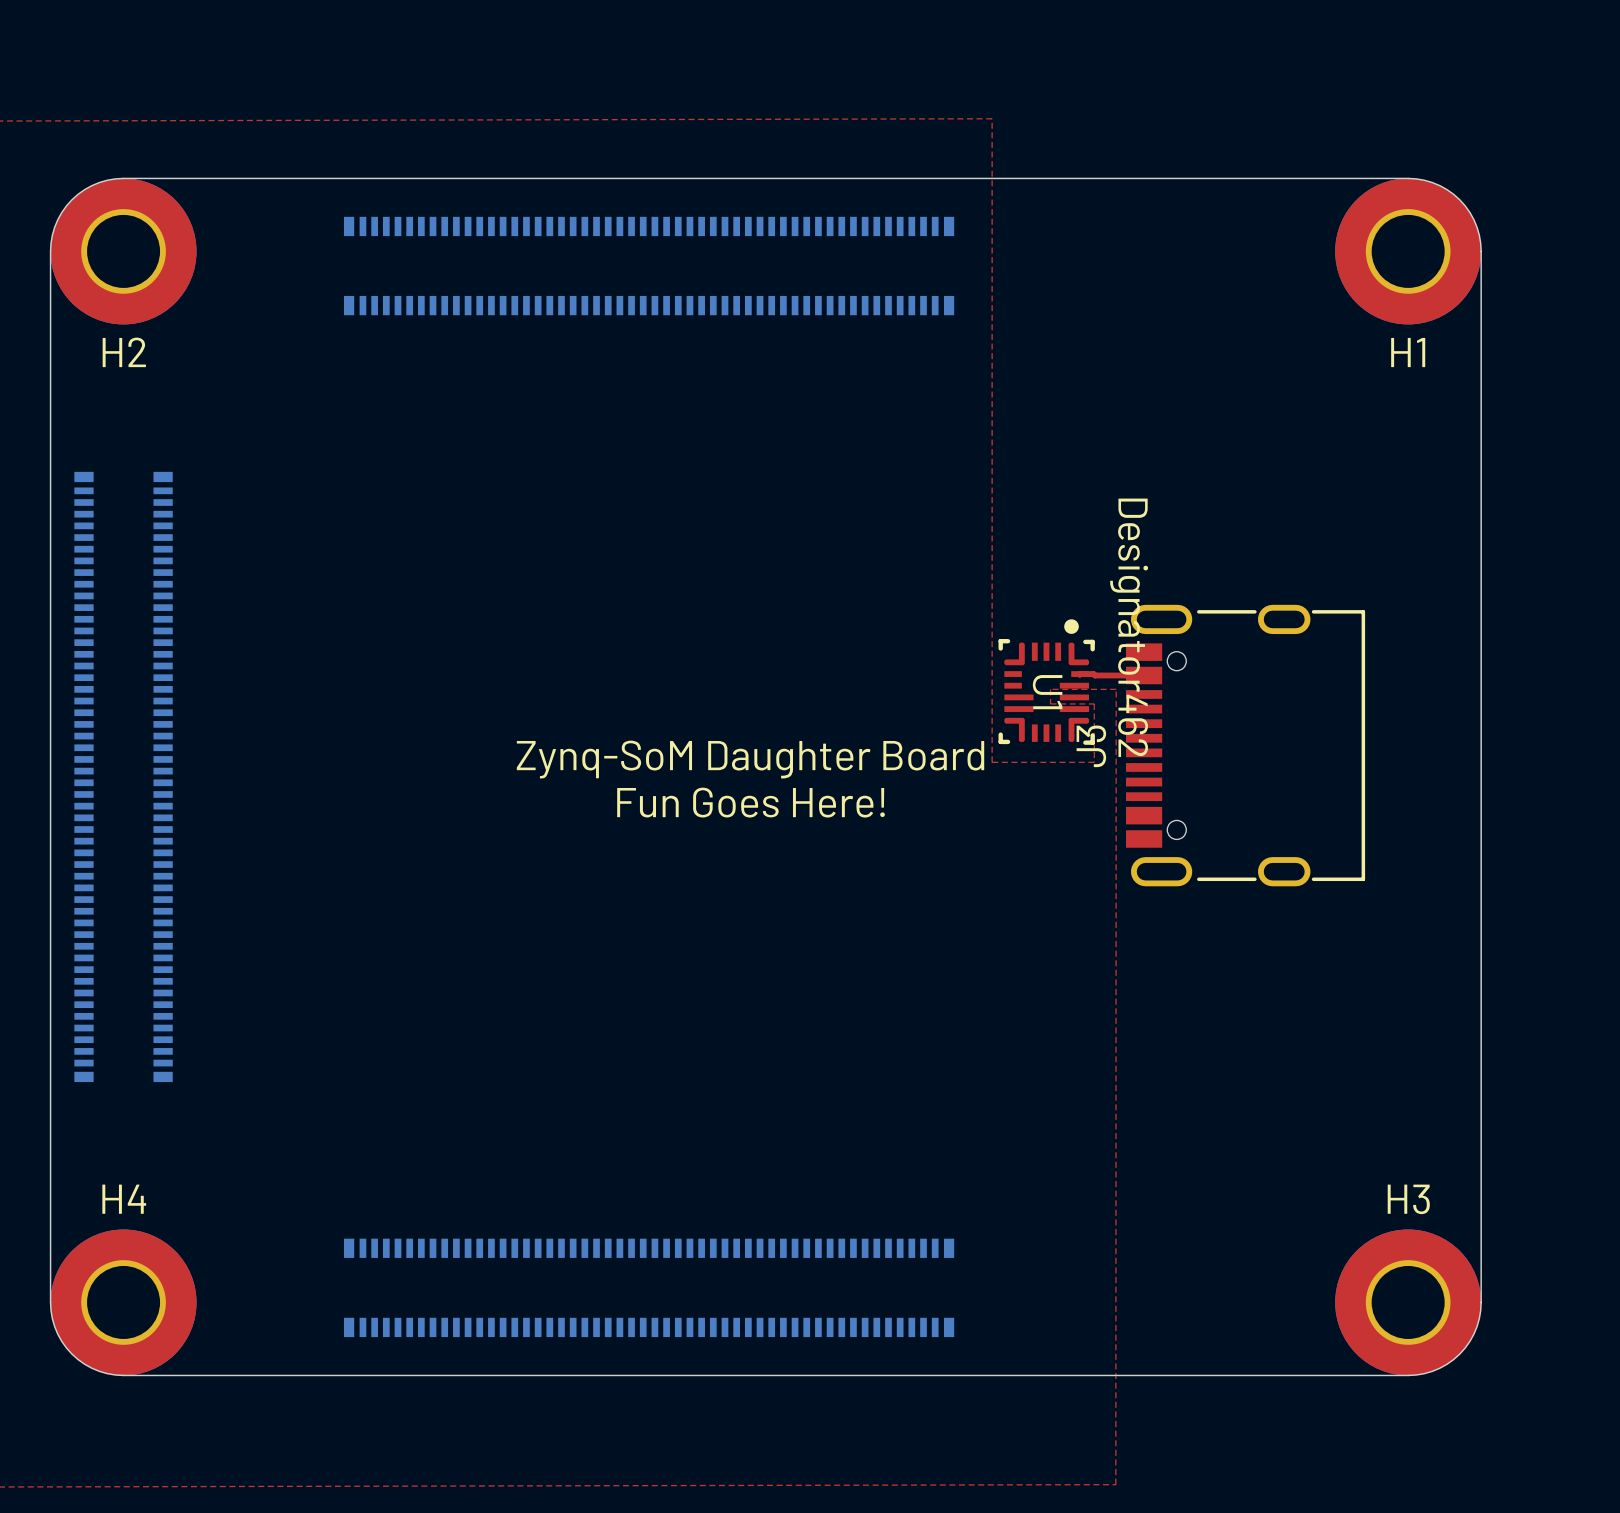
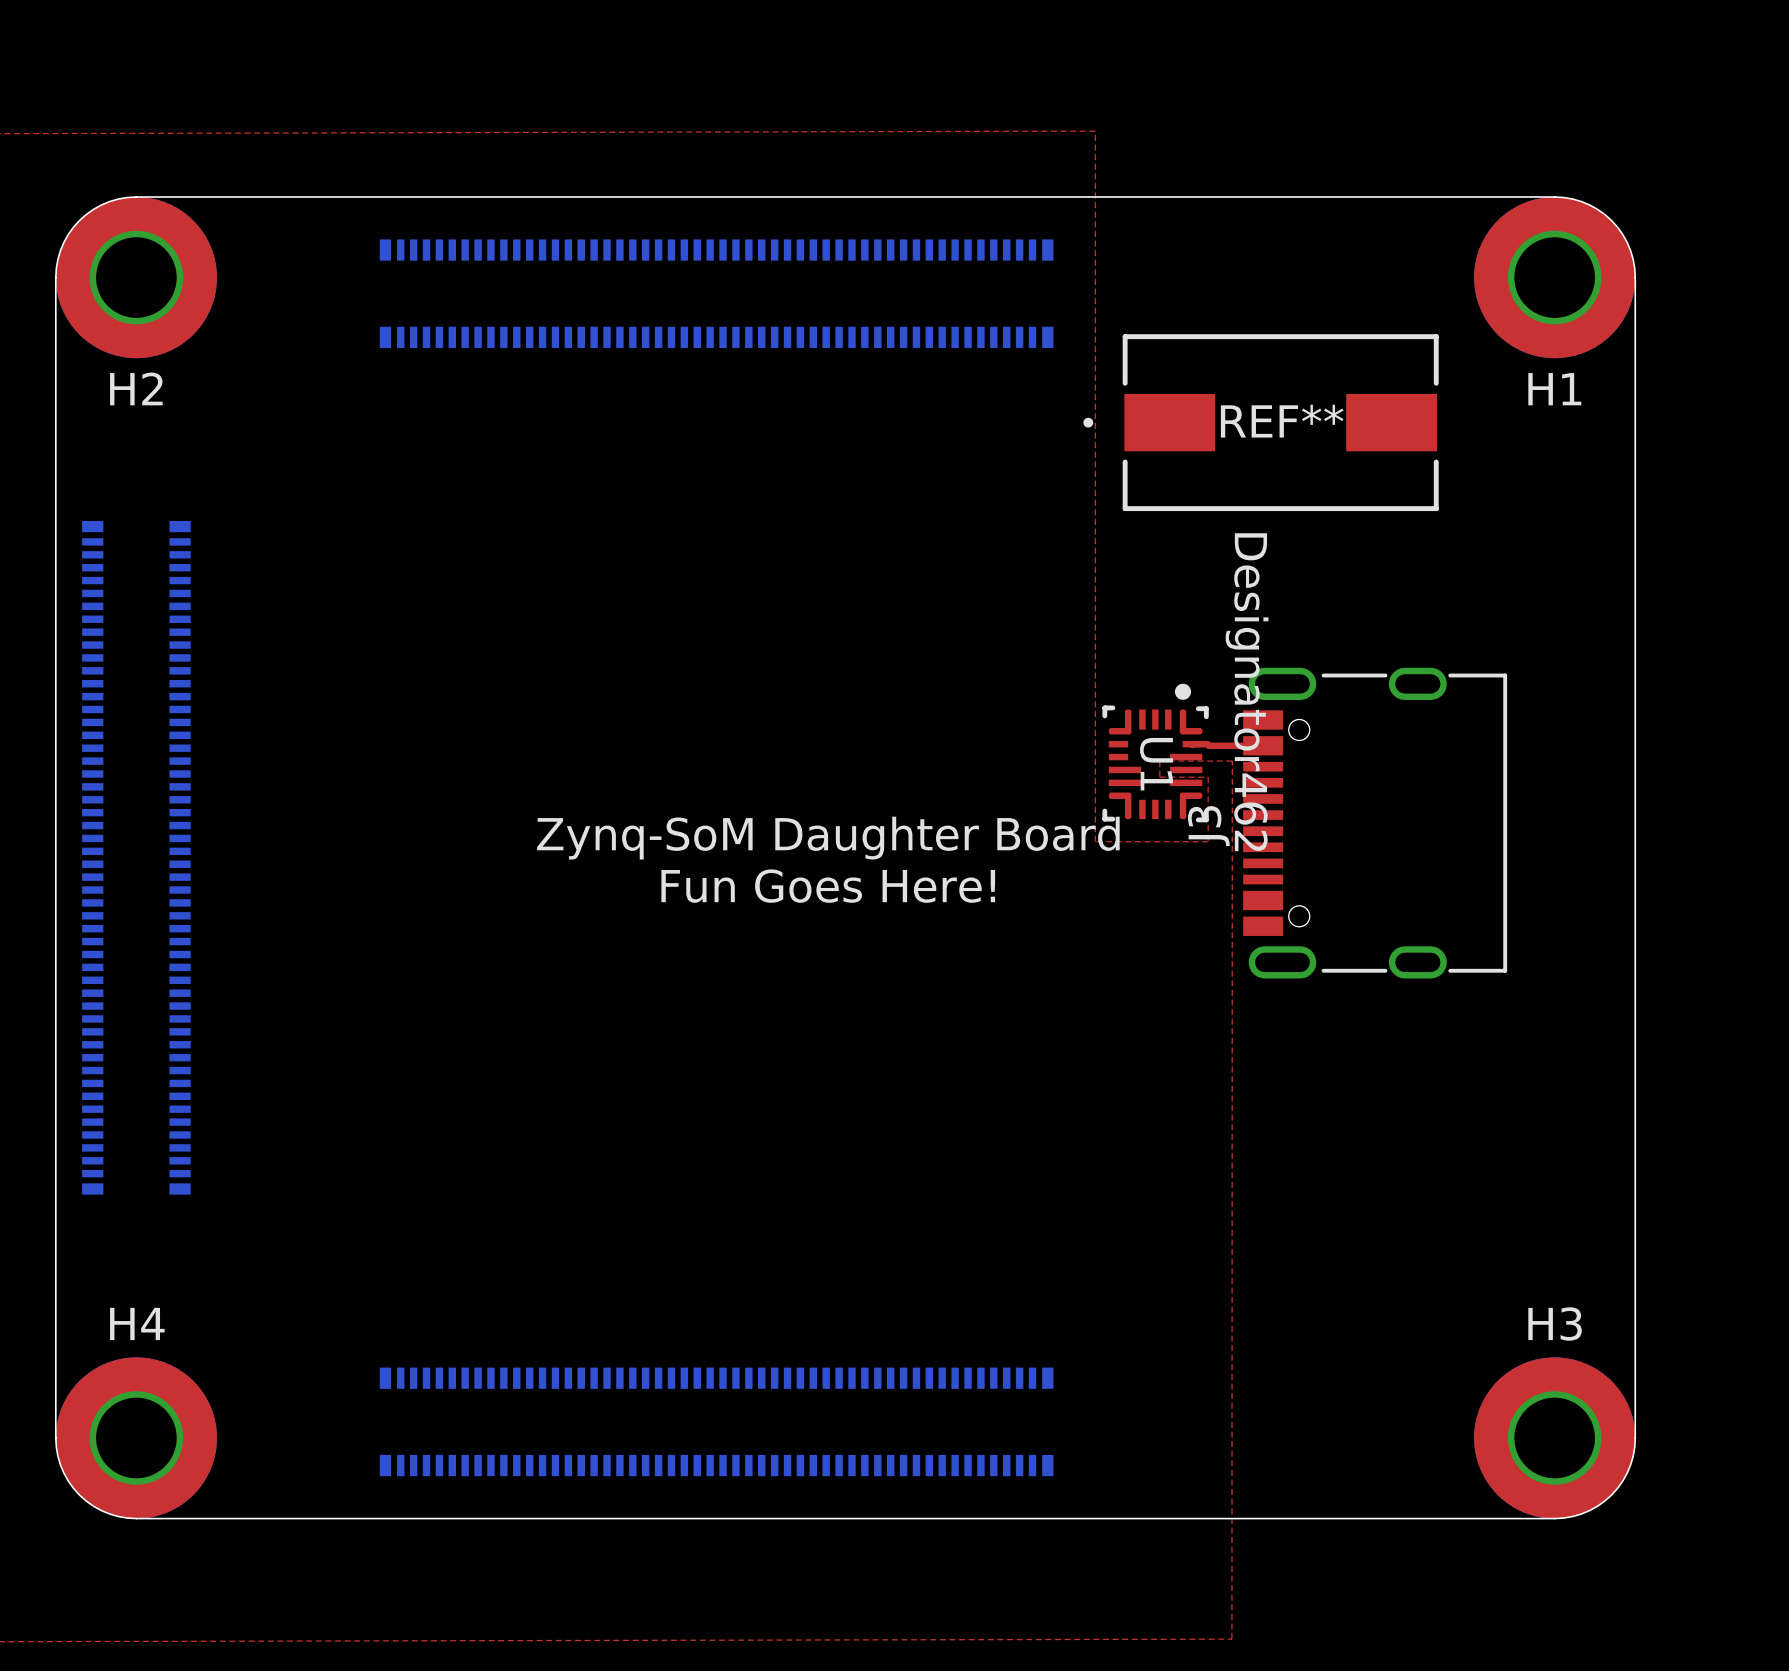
REF**: none -> (1261, 422)

